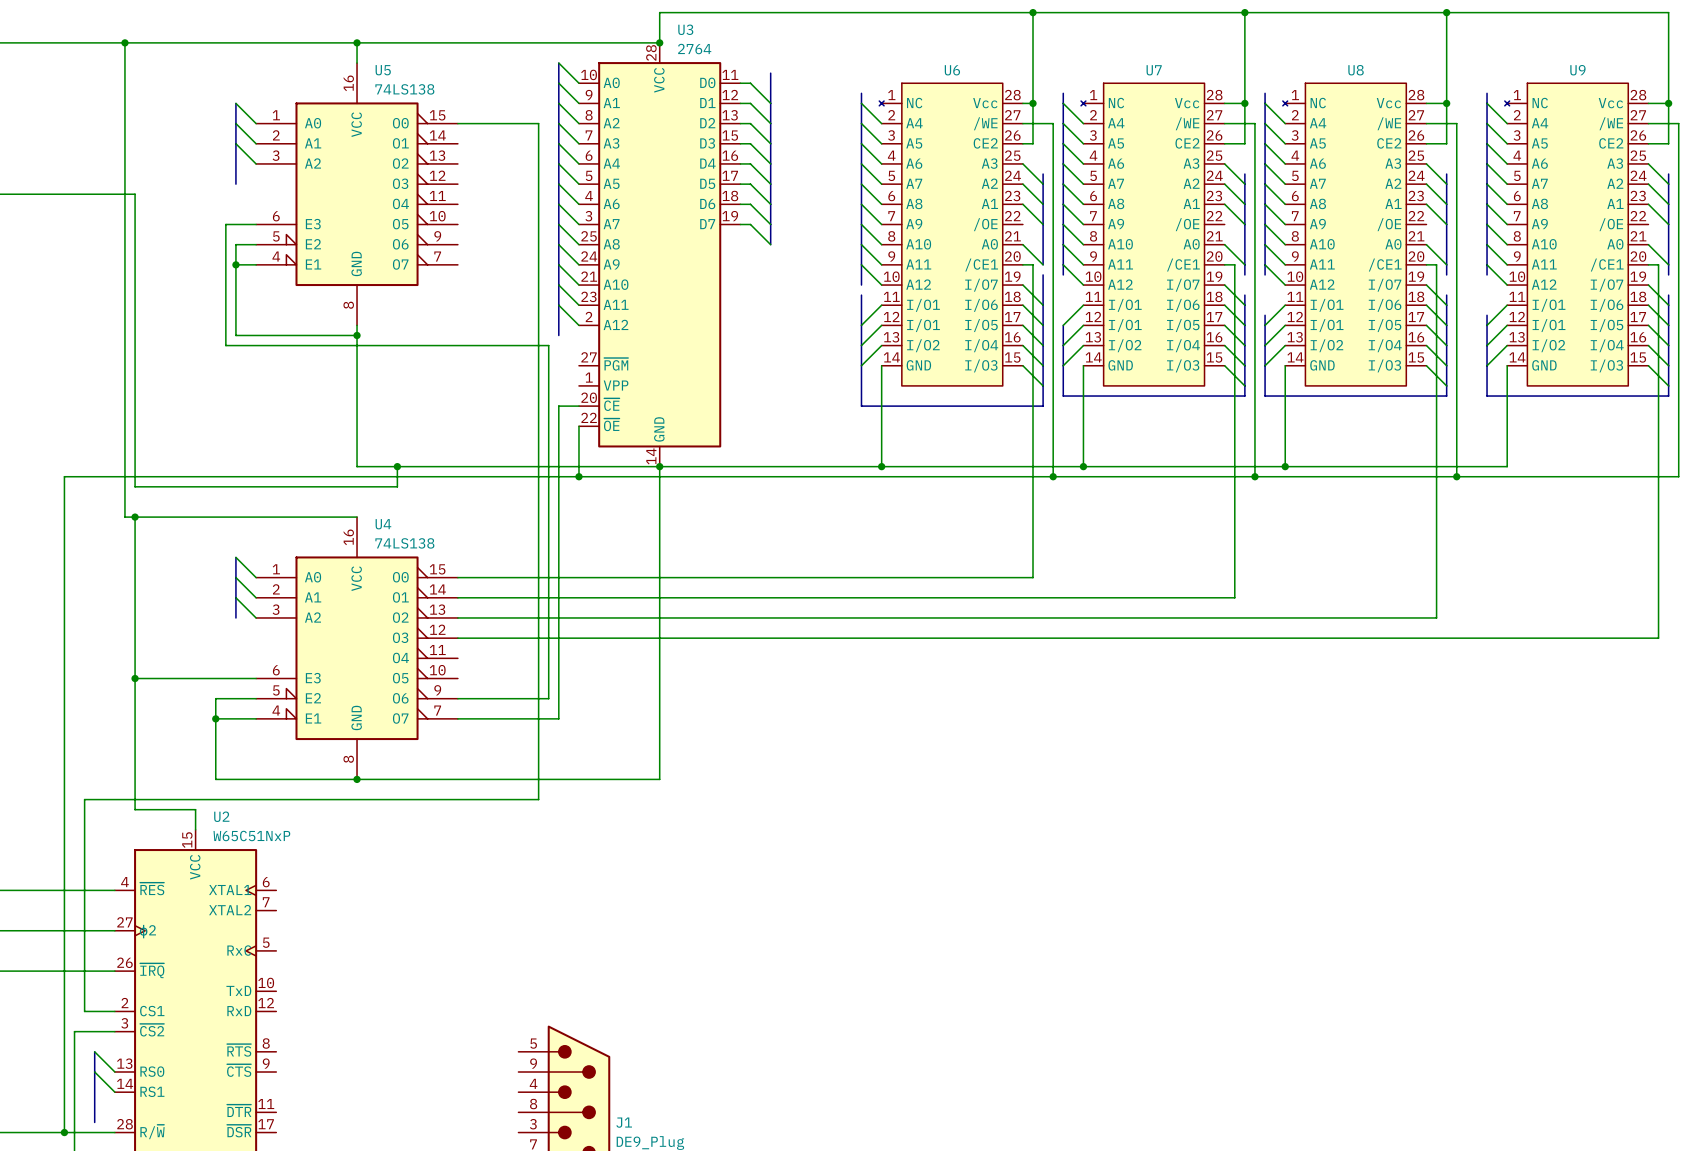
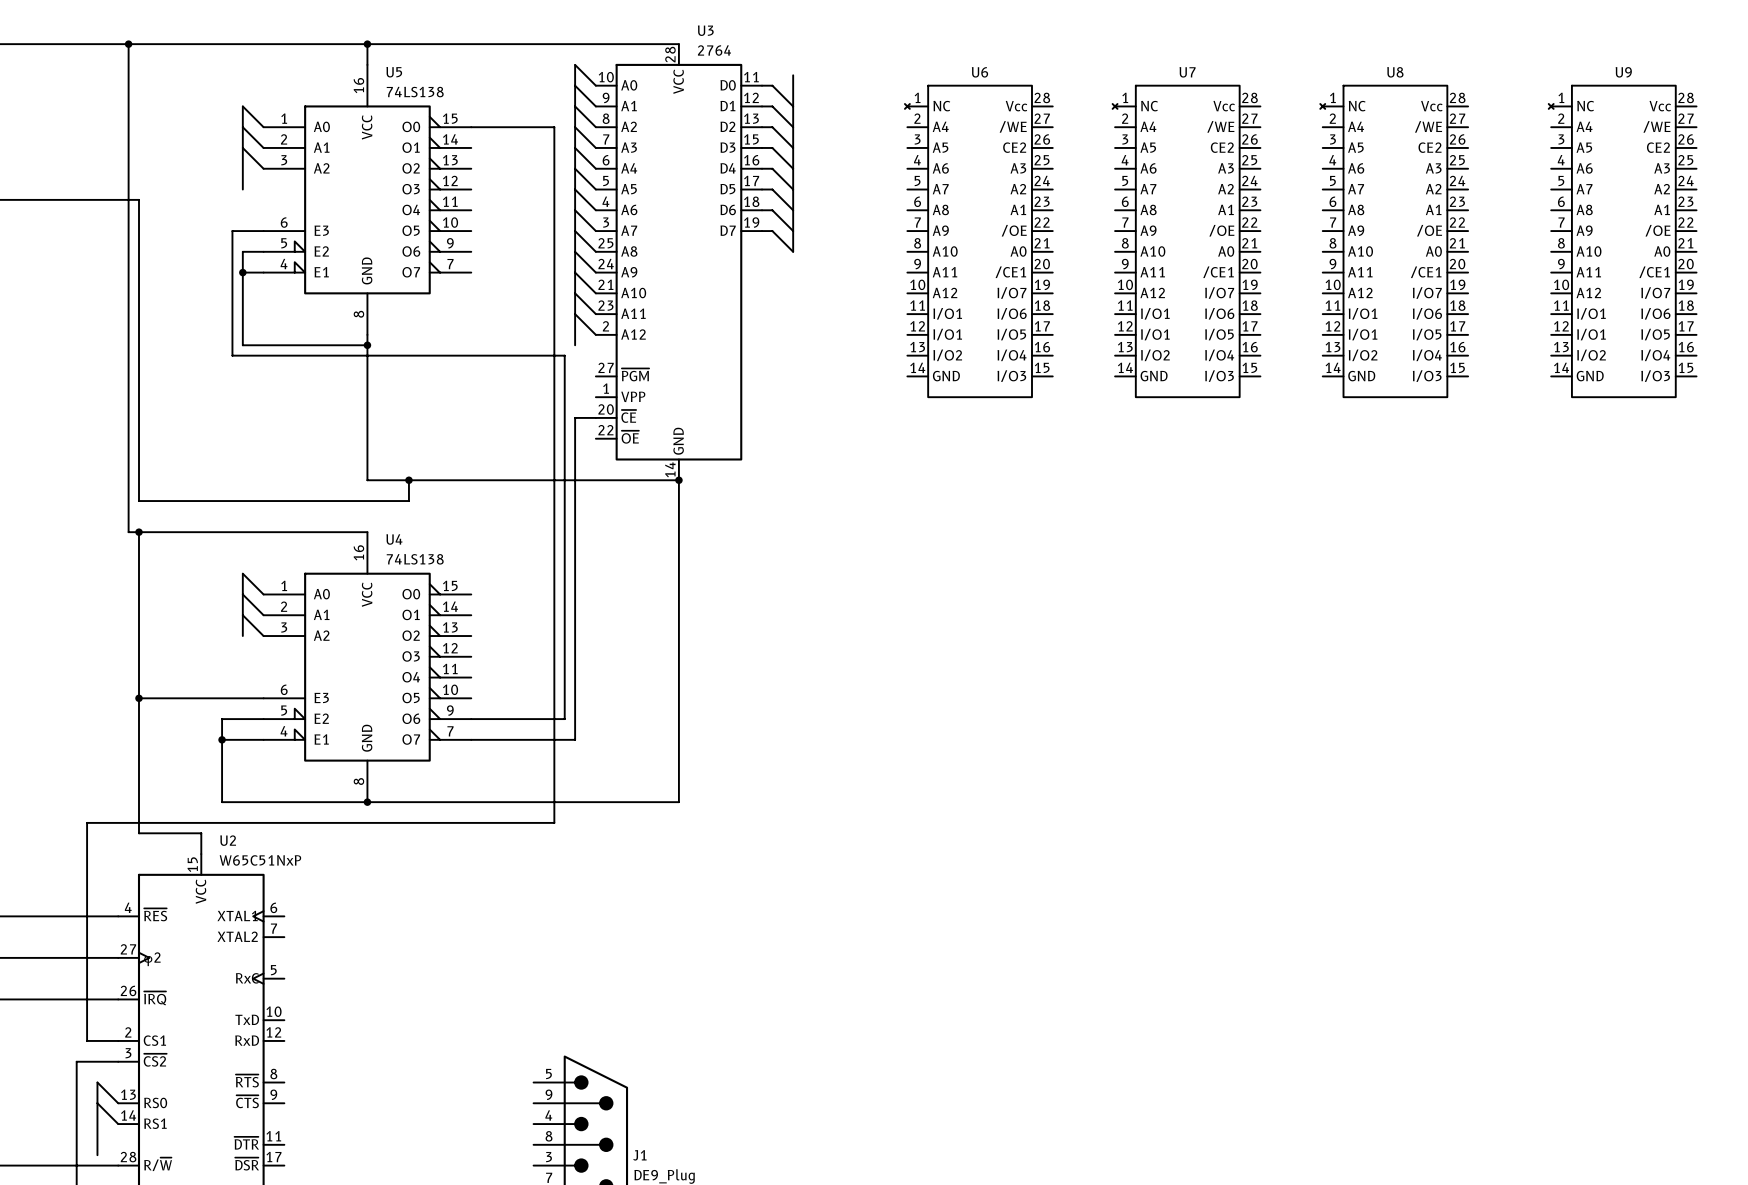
wire: (1033, 12) (1033, 143) (1022, 143) -> none
junction: (1033, 12) -> none
wire: (1244, 12) (1244, 143) (1224, 143) -> none
junction: (1244, 12) -> none
wire: (1446, 12) (1446, 143) (1426, 143) -> none
junction: (1446, 12) -> none
wire: (659, 42) (659, 12) (1668, 12) (1668, 143) (1648, 143) -> none
junction: (659, 42) -> none
bus: (861, 93) (861, 285) -> none
bus: (1063, 93) (1063, 274) -> none
bus: (1265, 93) (1265, 274) -> none
bus: (1487, 93) (1487, 274) -> none
wire: (861, 103) (881, 123) -> none
wire: (1022, 103) (1033, 103) -> none
junction: (1033, 103) -> none
wire: (1063, 103) (1083, 123) -> none
wire: (1224, 103) (1244, 103) -> none
junction: (1244, 103) -> none
wire: (1265, 103) (1285, 123) -> none
wire: (1426, 103) (1446, 103) -> none
junction: (1446, 103) -> none
wire: (1487, 103) (1507, 123) -> none
wire: (1648, 103) (1668, 103) -> none
junction: (1668, 103) -> none
wire: (861, 123) (881, 143) -> none
wire: (1022, 123) (1053, 123) (1053, 476) -> none
wire: (1063, 123) (1083, 143) -> none
wire: (1224, 123) (1254, 123) (1254, 476) -> none
wire: (1265, 123) (1285, 143) -> none
wire: (1426, 123) (1456, 123) (1456, 476) -> none
wire: (1487, 123) (1507, 143) -> none
wire: (1648, 123) (1678, 123) (1678, 476) (64, 476) (64, 1132) -> none
wire: (861, 143) (881, 163) -> none
wire: (1063, 143) (1083, 163) -> none
wire: (1265, 143) (1285, 163) -> none
wire: (1487, 143) (1507, 163) -> none
wire: (861, 163) (881, 184) -> none
wire: (1022, 163) (1043, 184) -> none
wire: (1063, 163) (1083, 184) -> none
wire: (1224, 163) (1244, 184) -> none
wire: (1265, 163) (1285, 184) -> none
wire: (1426, 163) (1446, 184) -> none
wire: (1487, 163) (1507, 184) -> none
wire: (1648, 163) (1668, 184) -> none
bus: (1043, 174) (1043, 264) -> none
bus: (1244, 174) (1244, 274) -> none
bus: (1446, 174) (1446, 274) -> none
bus: (1668, 174) (1668, 274) -> none
wire: (861, 184) (881, 204) -> none
wire: (1022, 184) (1043, 204) -> none
wire: (1063, 184) (1083, 204) -> none
wire: (1224, 184) (1244, 204) -> none
wire: (1265, 184) (1285, 204) -> none
wire: (1426, 184) (1446, 204) -> none
wire: (1487, 184) (1507, 204) -> none
wire: (1648, 184) (1668, 204) -> none
wire: (861, 204) (881, 224) -> none
wire: (1022, 204) (1043, 224) -> none
wire: (1063, 204) (1083, 224) -> none
wire: (1224, 204) (1244, 224) -> none
wire: (1265, 204) (1285, 224) -> none
wire: (1426, 204) (1446, 224) -> none
wire: (1487, 204) (1507, 224) -> none
wire: (1648, 204) (1668, 224) -> none
wire: (861, 224) (881, 244) -> none
wire: (1063, 224) (1083, 244) -> none
wire: (1265, 224) (1285, 244) -> none
wire: (1487, 224) (1507, 244) -> none
wire: (861, 244) (881, 264) -> none
wire: (1022, 244) (1043, 264) -> none
wire: (1063, 244) (1083, 264) -> none
wire: (1224, 244) (1244, 264) -> none
wire: (1265, 244) (1285, 264) -> none
wire: (1426, 244) (1446, 264) -> none
wire: (1487, 244) (1507, 264) -> none
wire: (1648, 244) (1668, 264) -> none
wire: (861, 264) (881, 285) -> none
wire: (1022, 264) (1033, 264) (1033, 577) (457, 577) -> none
wire: (1063, 264) (1083, 285) -> none
wire: (1224, 264) (1234, 264) (1234, 597) (457, 597) -> none
wire: (1265, 264) (1285, 285) -> none
wire: (1426, 264) (1436, 264) (1436, 617) (457, 617) -> none
wire: (1487, 264) (1507, 285) -> none
wire: (1648, 264) (1658, 264) (1658, 638) (457, 638) -> none
bus: (1043, 274) (1043, 406) (861, 406) (861, 295) -> none
wire: (1022, 285) (1043, 305) -> none
wire: (1224, 285) (1244, 305) -> none
wire: (1426, 285) (1446, 305) -> none
wire: (1648, 285) (1668, 305) -> none
bus: (1244, 295) (1244, 396) (1063, 396) (1063, 325) -> none
bus: (1446, 295) (1446, 396) (1265, 396) (1265, 315) -> none
bus: (1668, 295) (1668, 396) (1487, 396) (1487, 315) -> none
wire: (881, 305) (861, 325) -> none
wire: (1022, 305) (1043, 325) -> none
wire: (1083, 305) (1063, 325) -> none
wire: (1224, 305) (1244, 325) -> none
wire: (1285, 305) (1265, 325) -> none
wire: (1426, 305) (1446, 325) -> none
wire: (1507, 305) (1487, 325) -> none
wire: (1648, 305) (1668, 325) -> none
wire: (881, 325) (861, 345) -> none
wire: (1022, 325) (1043, 345) -> none
wire: (1083, 325) (1063, 345) -> none
wire: (1224, 325) (1244, 345) -> none
wire: (1285, 325) (1265, 345) -> none
wire: (1426, 325) (1446, 345) -> none
wire: (1507, 325) (1487, 345) -> none
wire: (1648, 325) (1668, 345) -> none
wire: (881, 345) (861, 365) -> none
wire: (1022, 345) (1043, 365) -> none
wire: (1083, 345) (1063, 365) -> none
wire: (1224, 345) (1244, 365) -> none
wire: (1285, 345) (1265, 365) -> none
wire: (1426, 345) (1446, 365) -> none
wire: (1507, 345) (1487, 365) -> none
wire: (1648, 345) (1668, 365) -> none
wire: (881, 365) (881, 466) -> none
wire: (1022, 365) (1043, 385) -> none
wire: (1083, 365) (1083, 466) -> none
wire: (1224, 365) (1244, 385) -> none
wire: (1285, 365) (1285, 466) -> none
wire: (1426, 365) (1446, 385) -> none
wire: (1507, 365) (1507, 466) (659, 466) -> none
wire: (1648, 365) (1668, 385) -> none
wire: (578, 426) (578, 476) -> none
junction: (881, 466) -> none
junction: (1083, 466) -> none
junction: (1285, 466) -> none
junction: (578, 476) -> none
junction: (1053, 476) -> none
junction: (1254, 476) -> none
junction: (1456, 476) -> none
junction: (64, 1132) -> none

